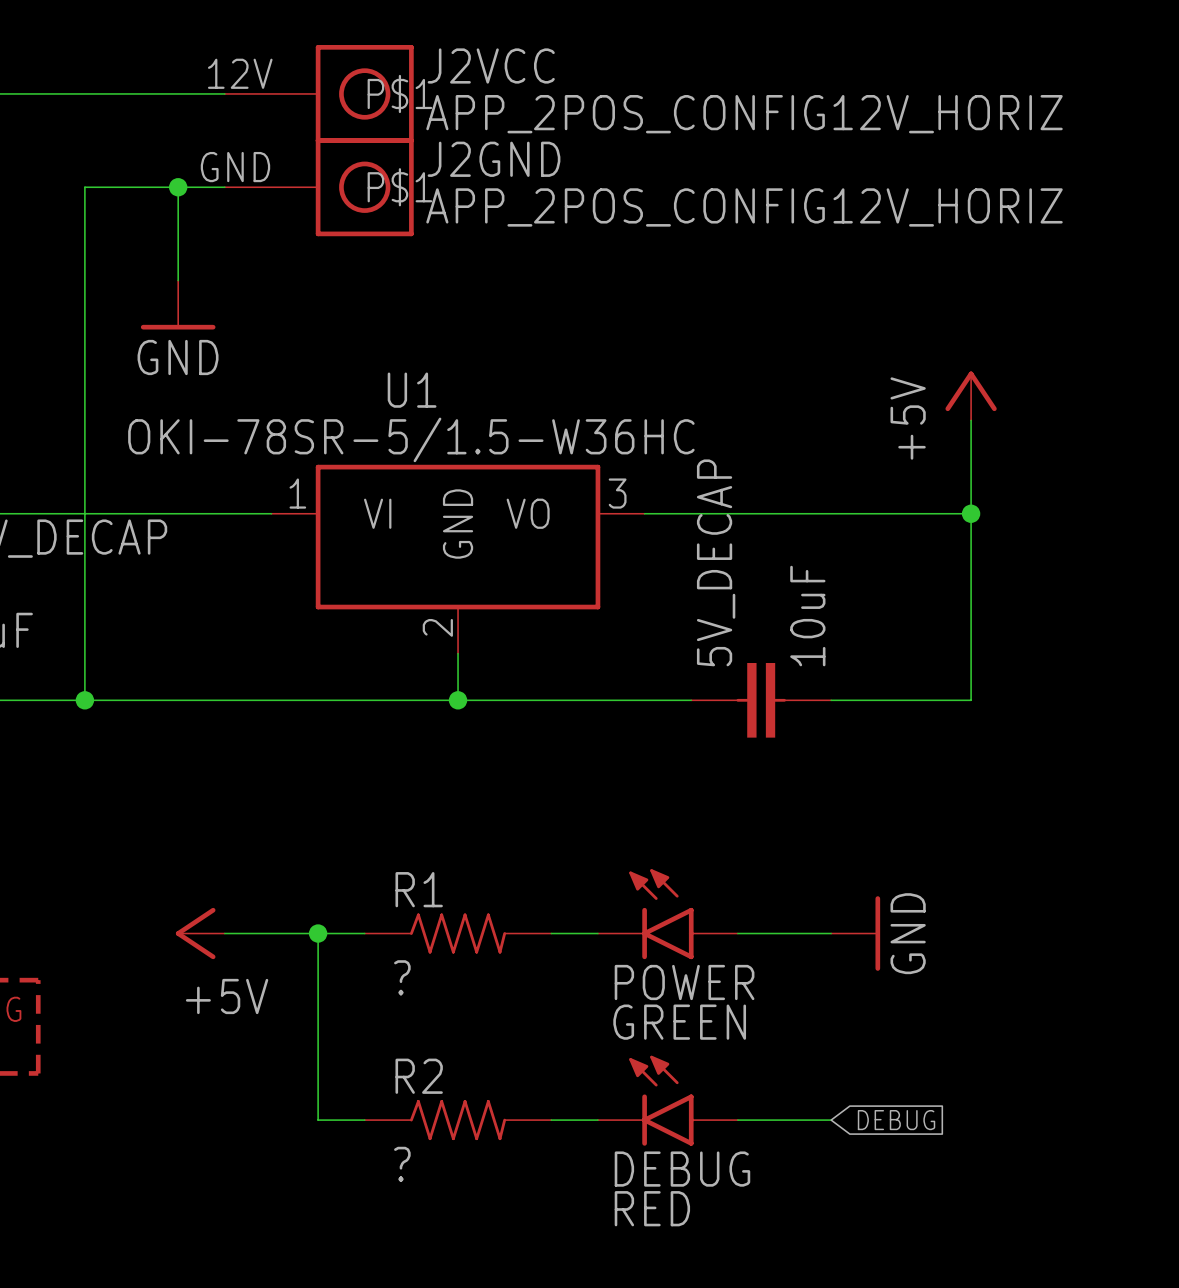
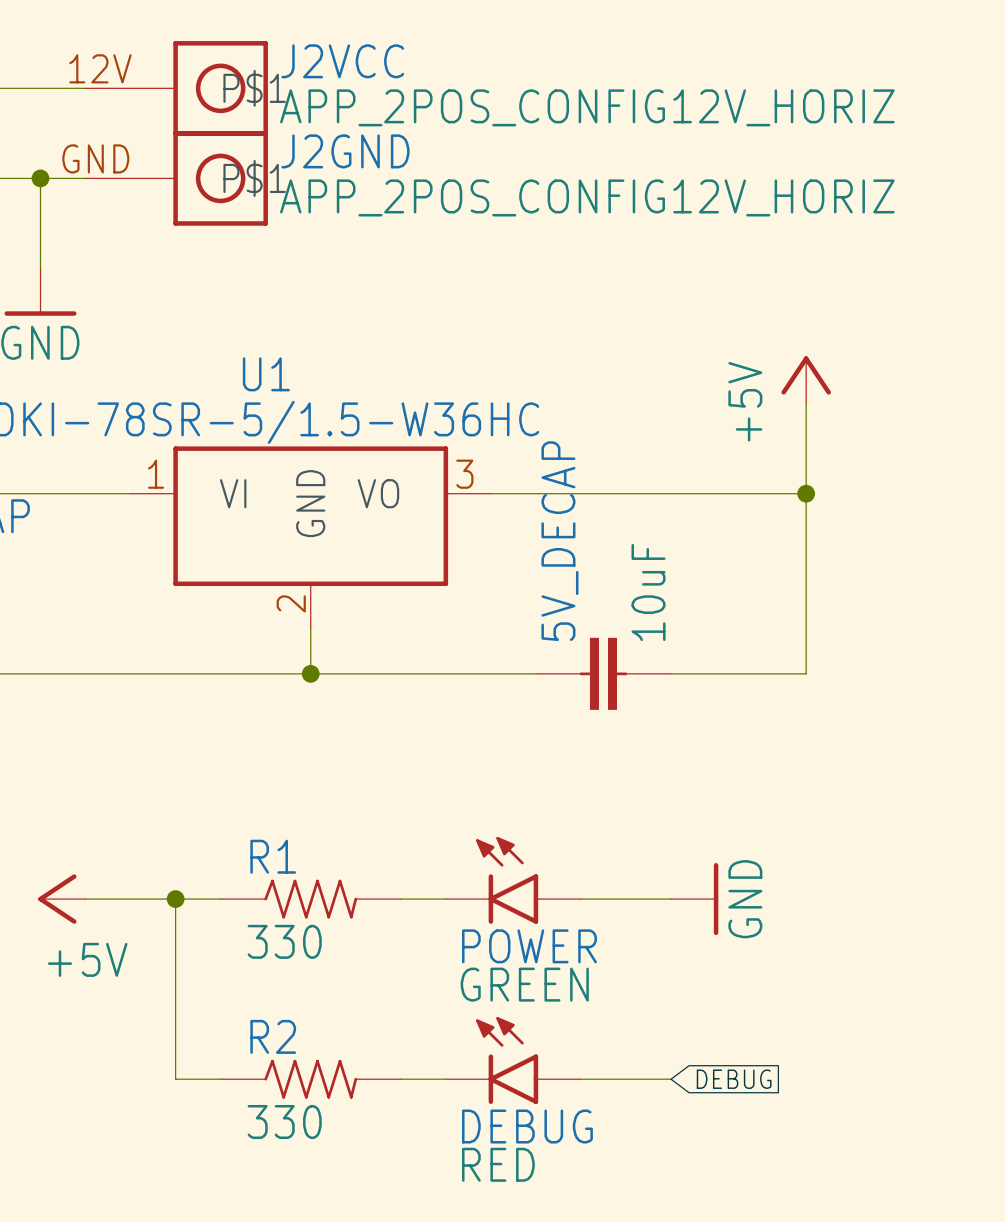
R1 value: ? (402, 977) -> 330 (284, 941)
R2 value: ? (402, 1164) -> 330 (284, 1122)

